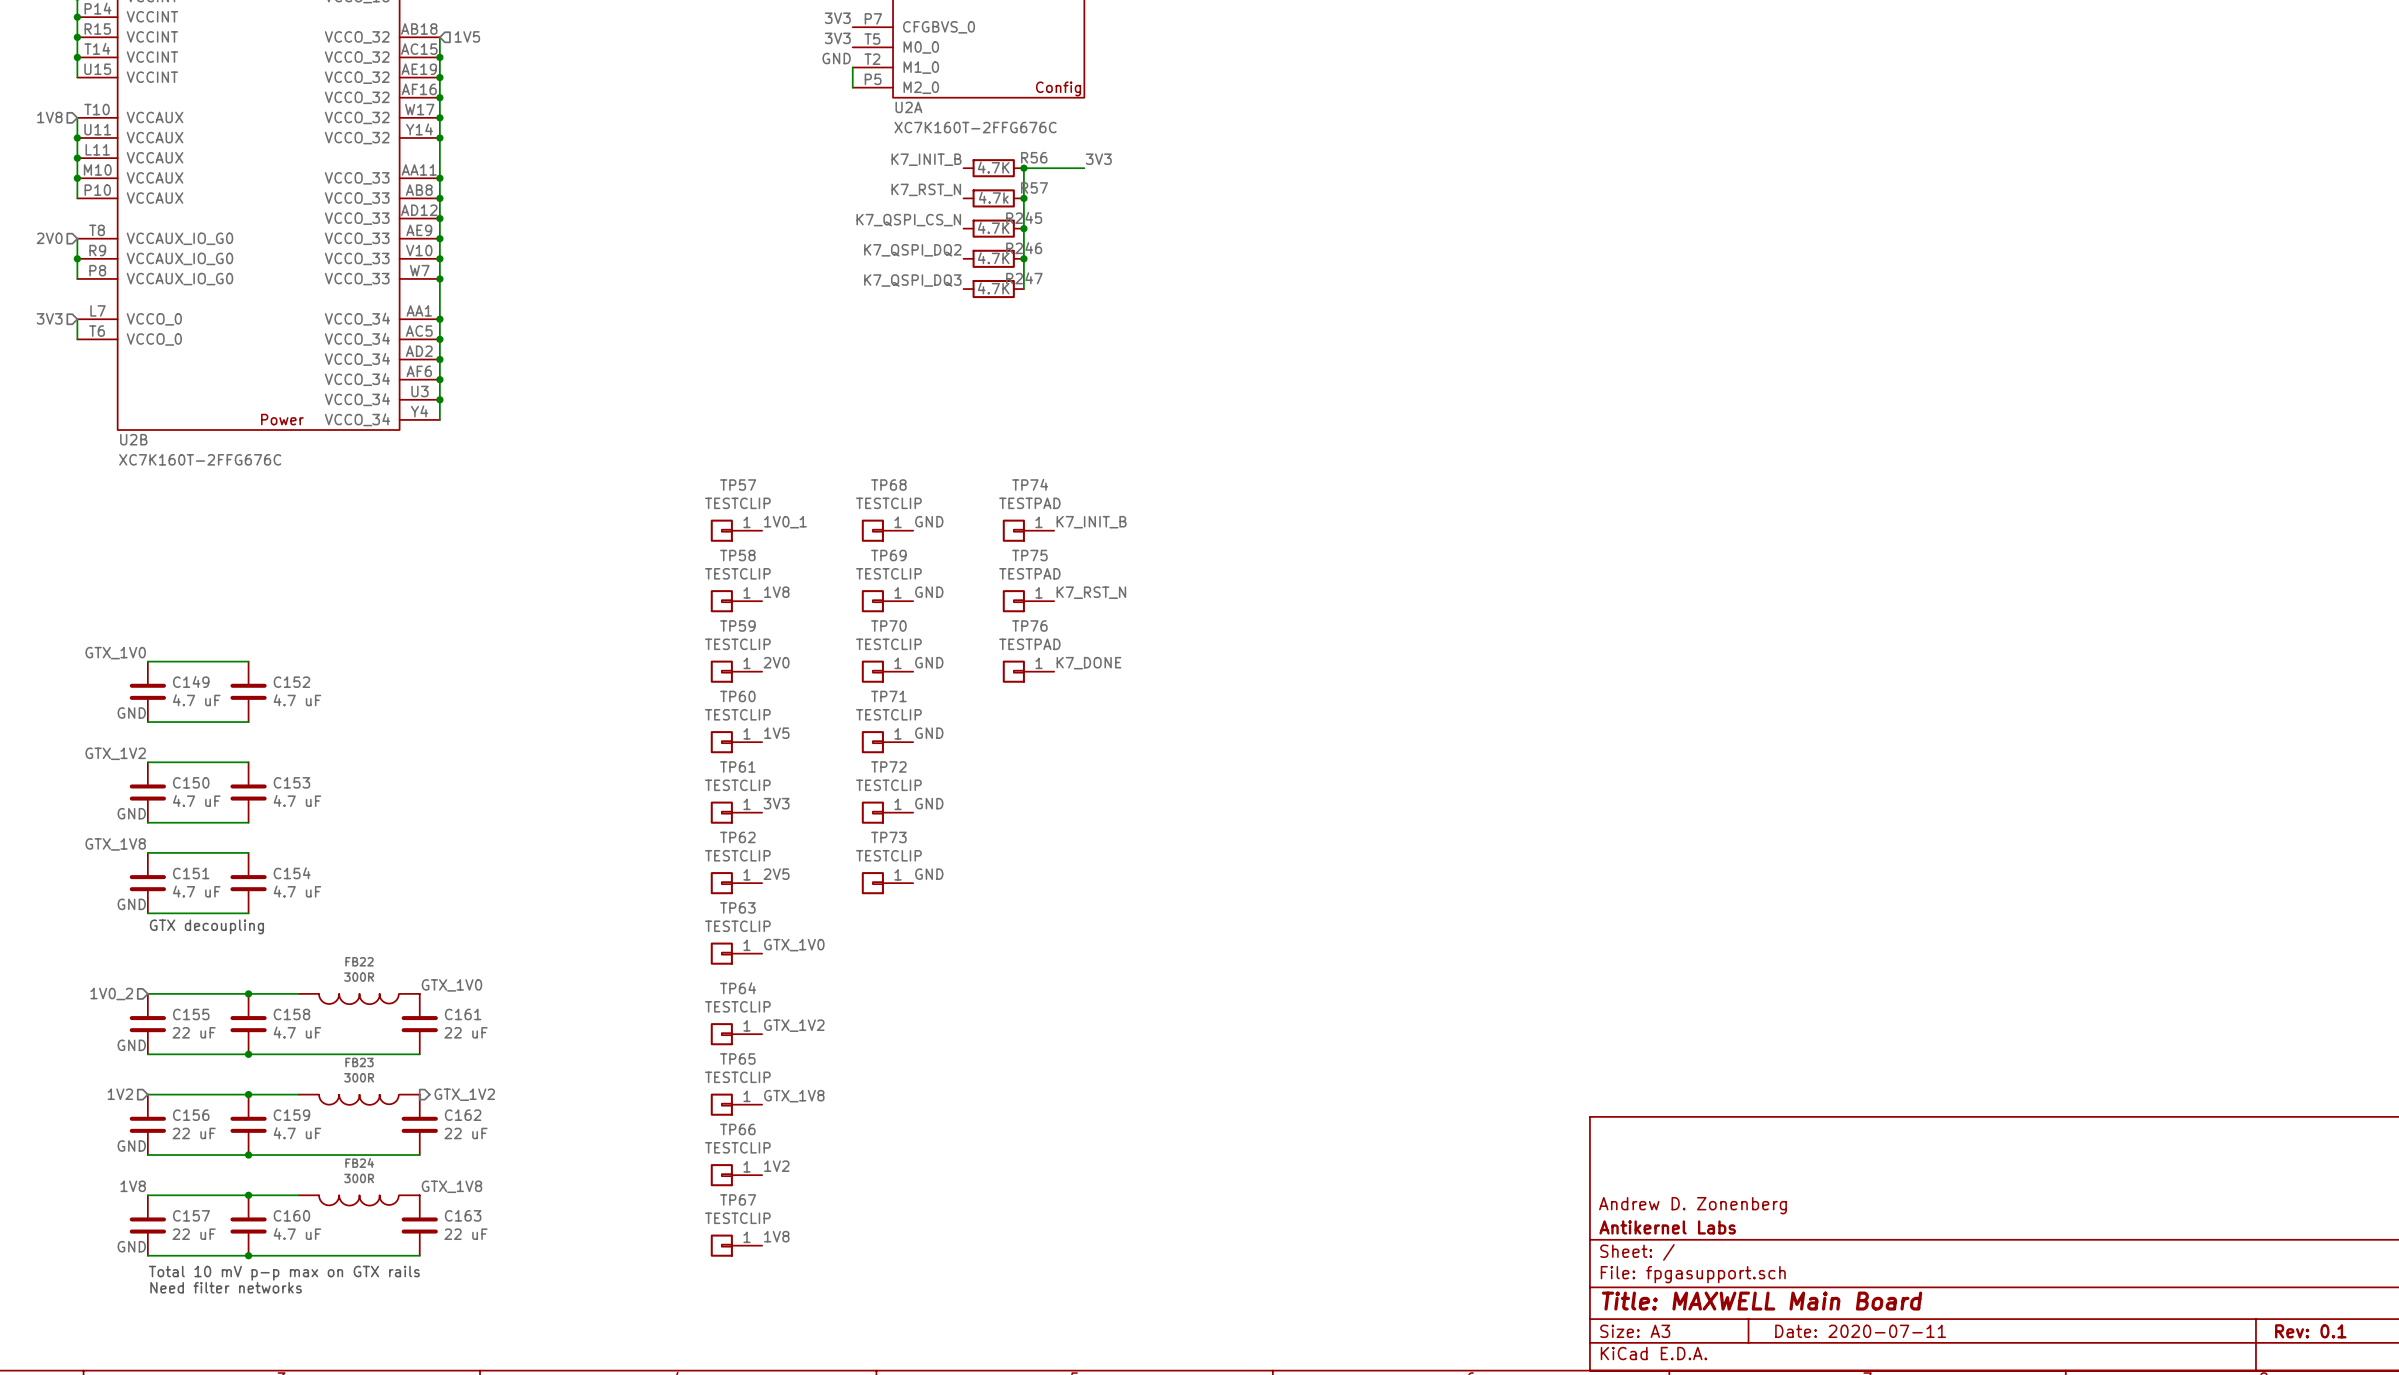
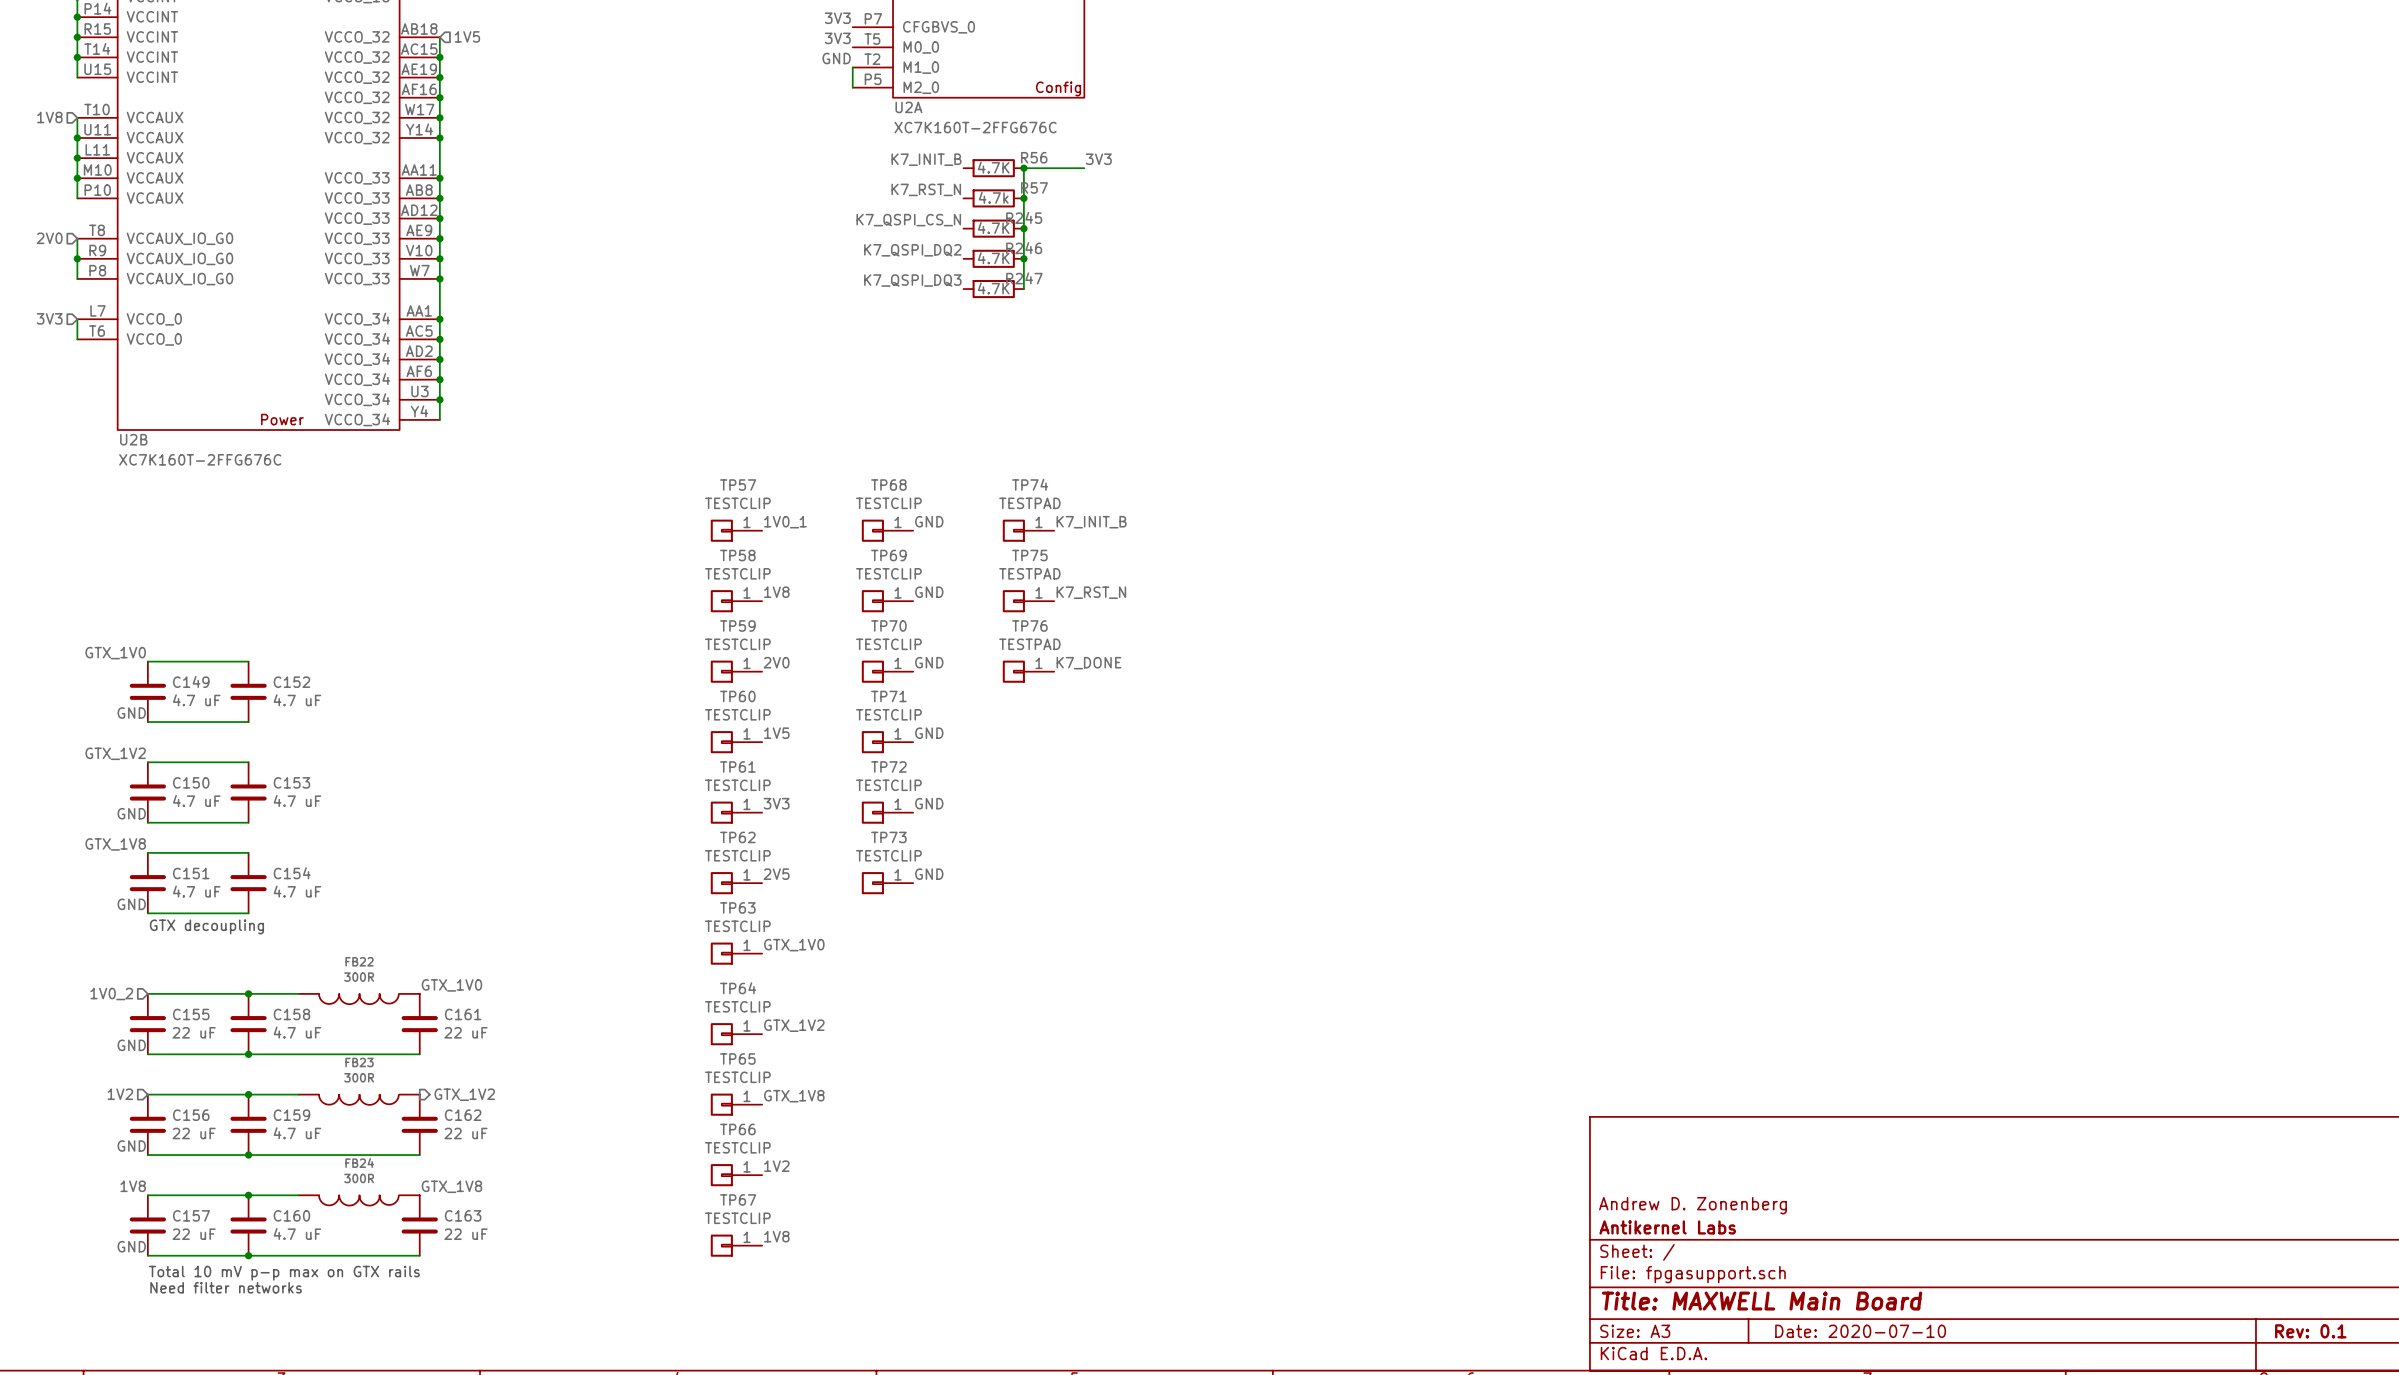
title block: Date: 2020-07-11 (1860, 1331) -> Date: 2020-07-10 (1860, 1331)

